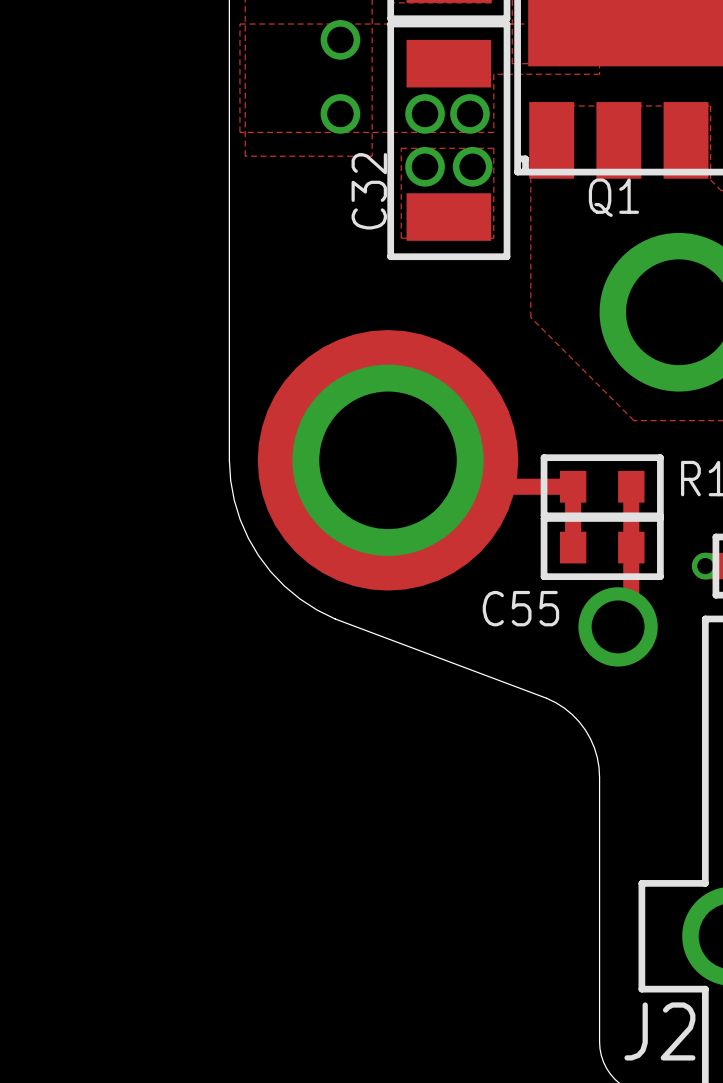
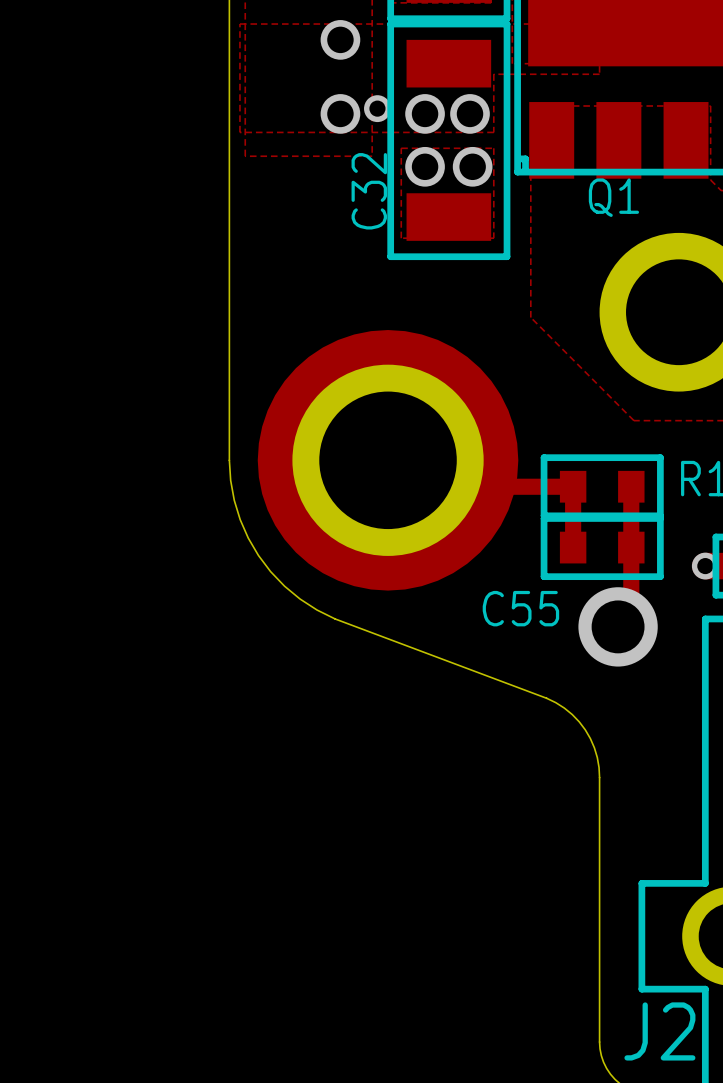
via: none -> (377, 108)

